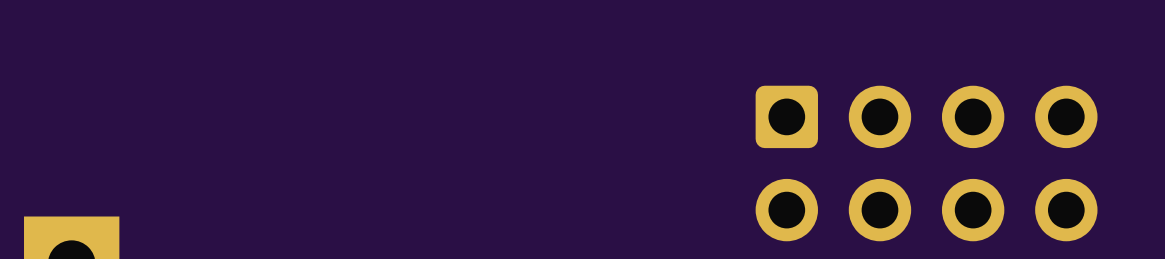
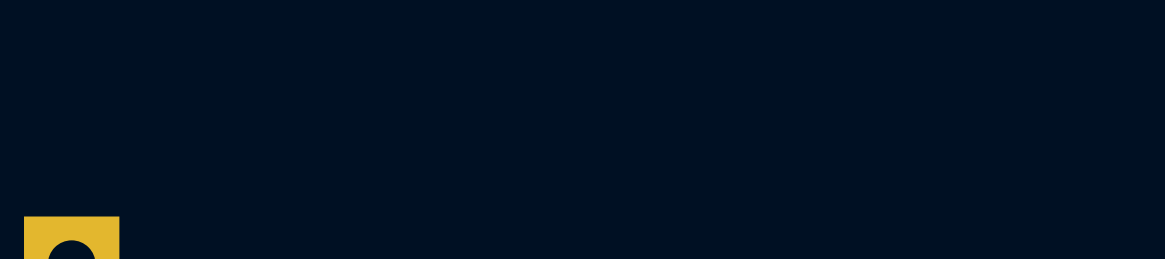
part: (926, 163) -> none

